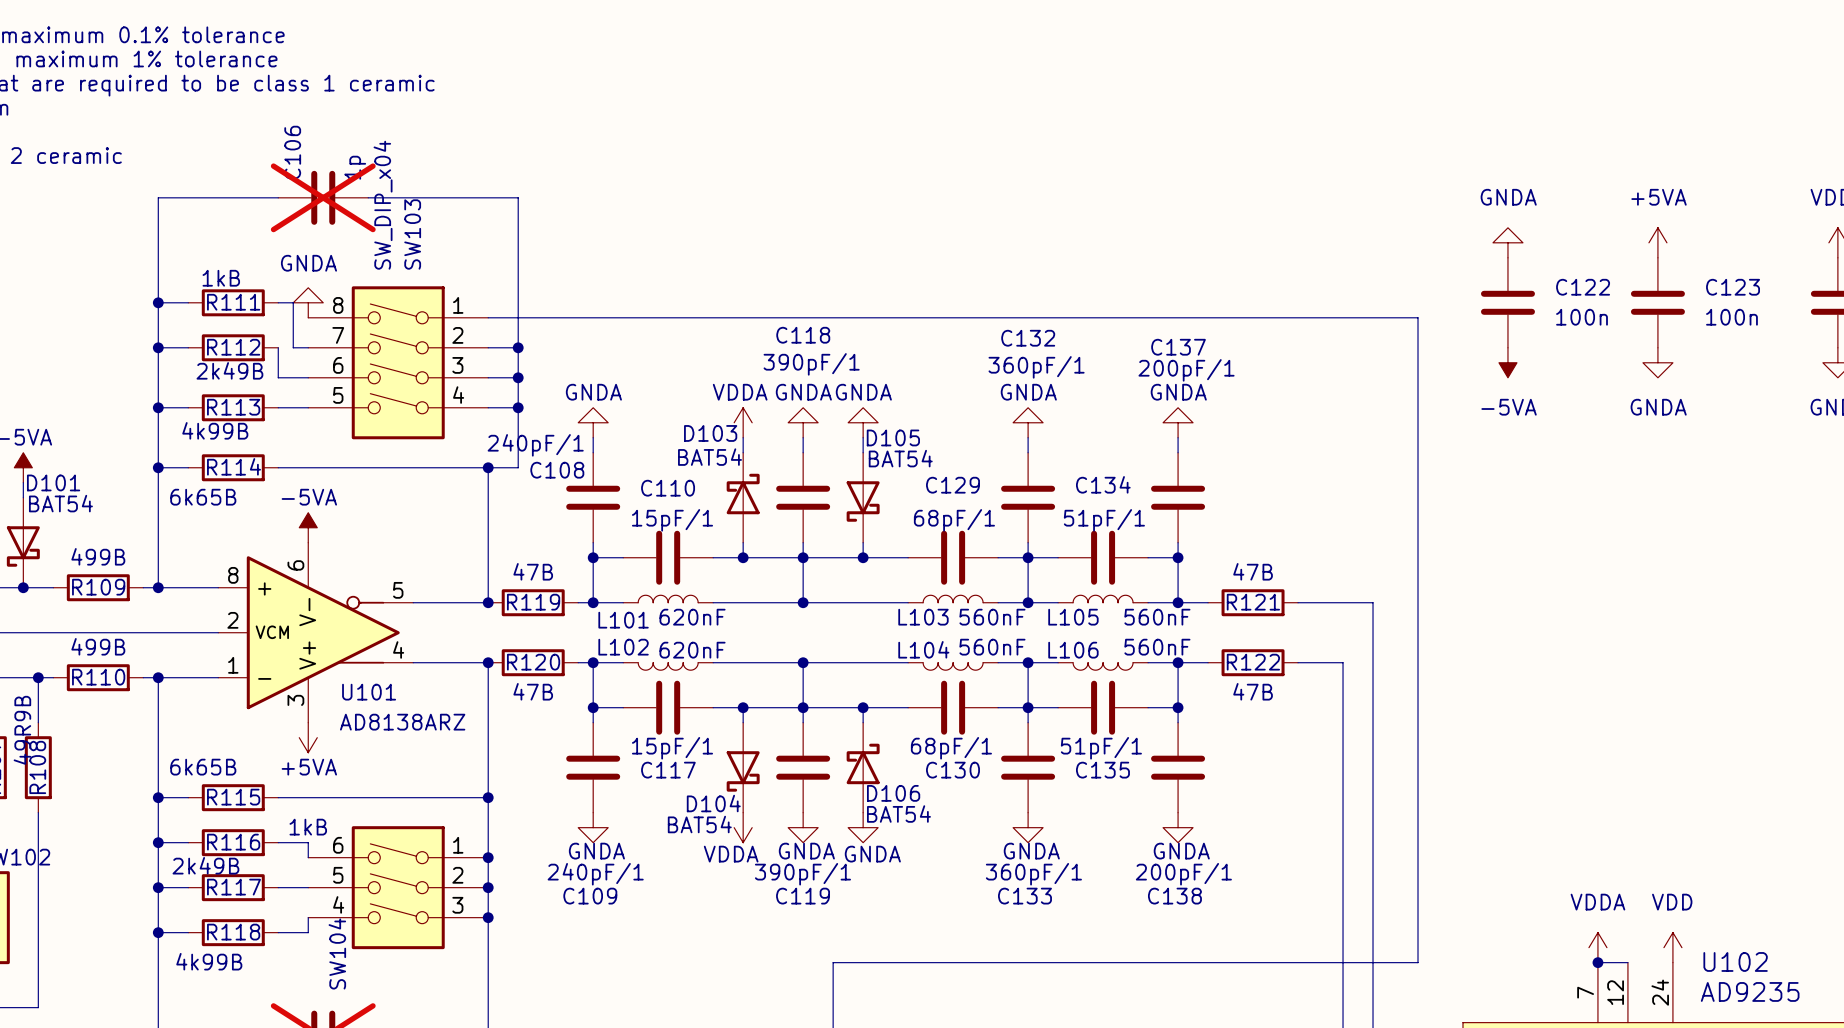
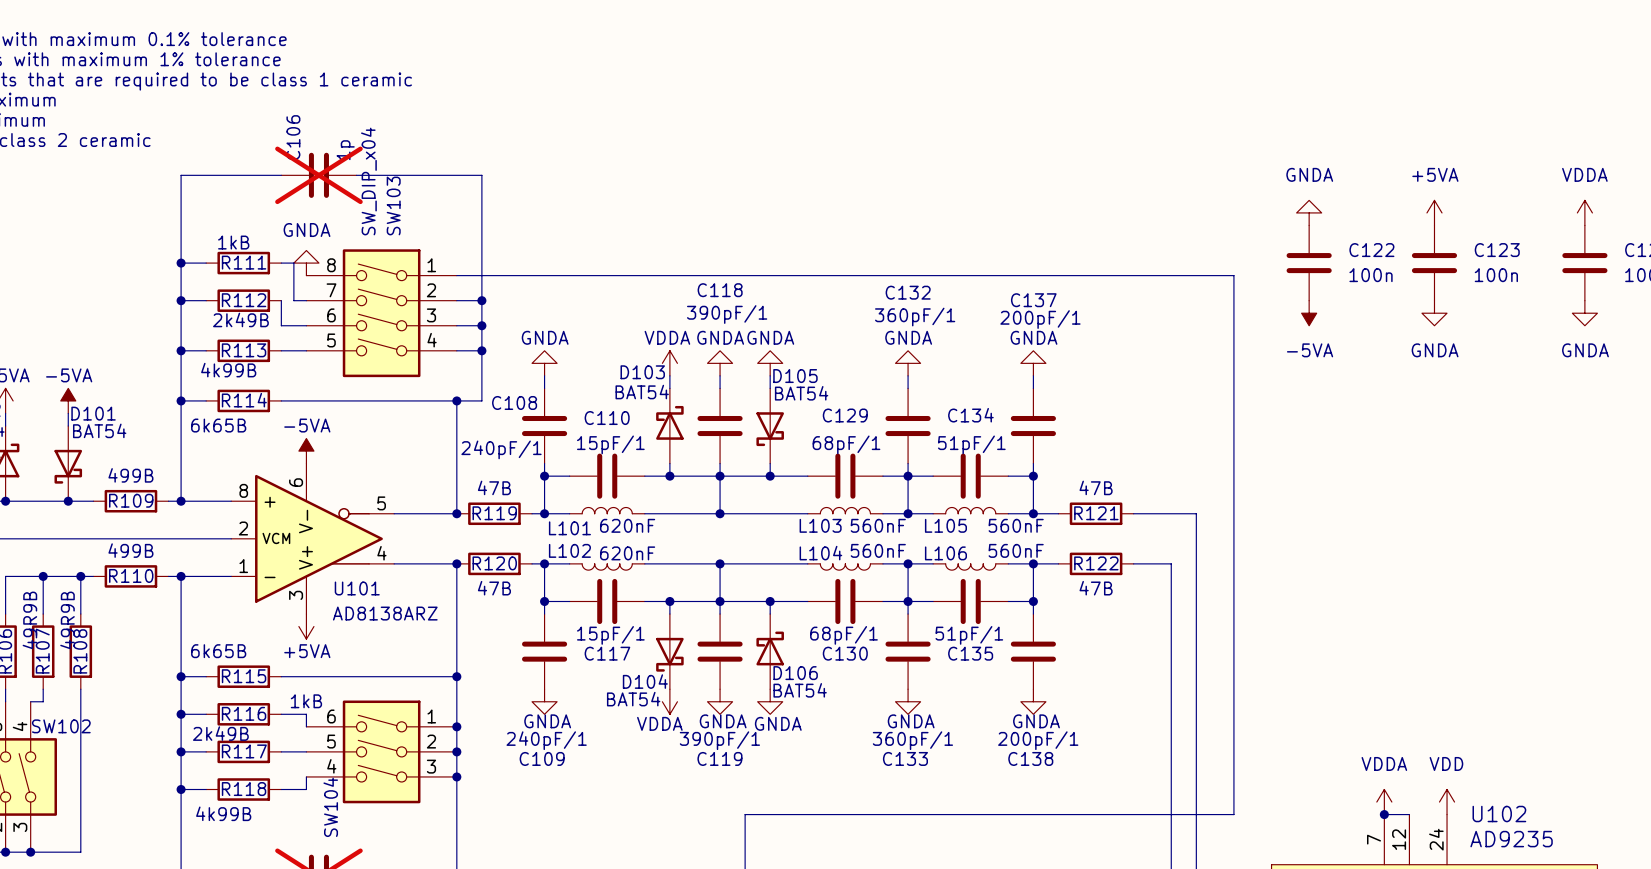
C108 value position: 240pF/1 (535, 445) -> 240pF/1 (501, 449)

